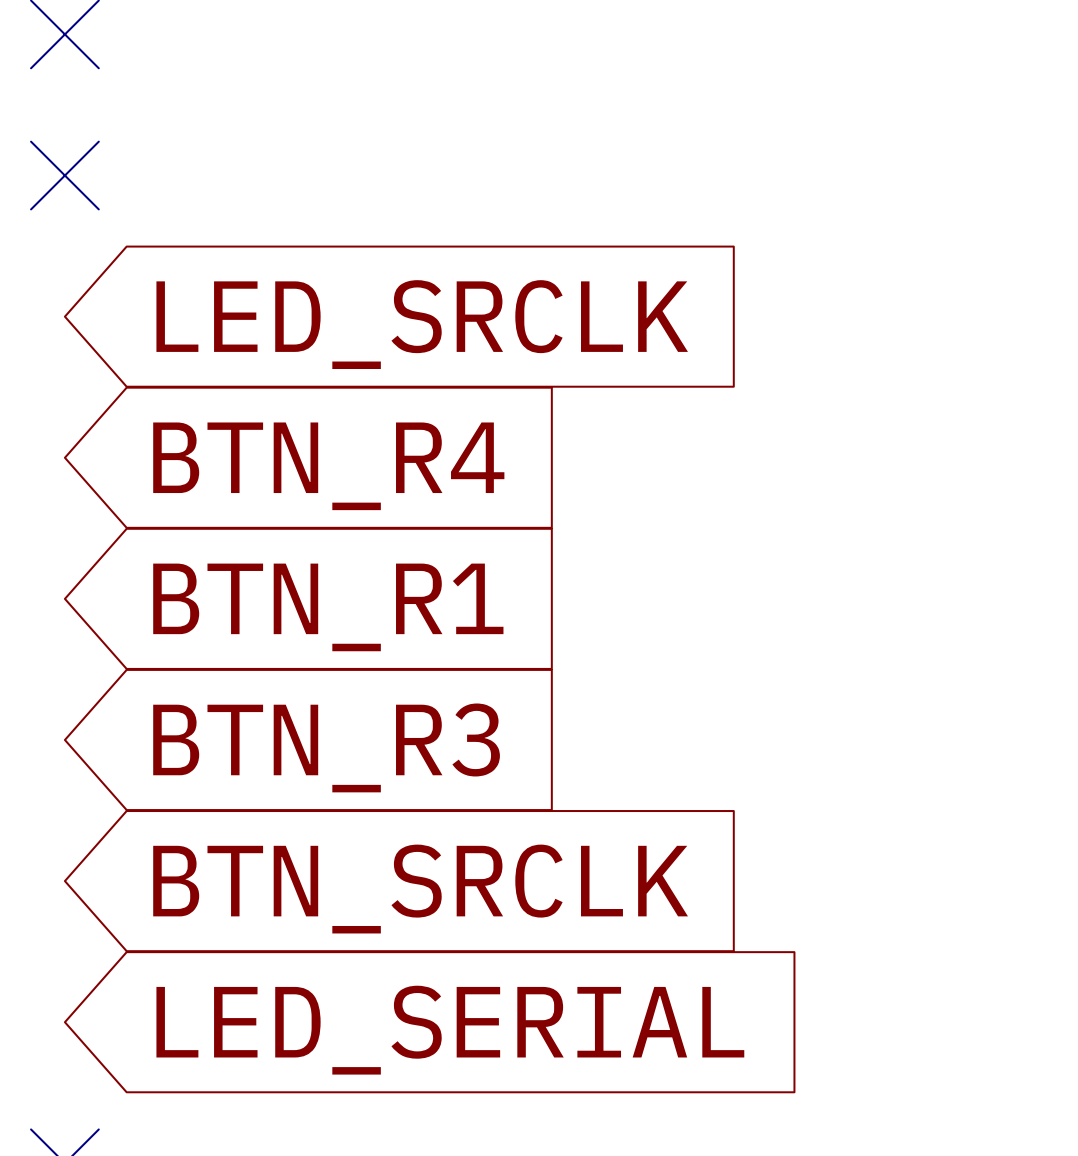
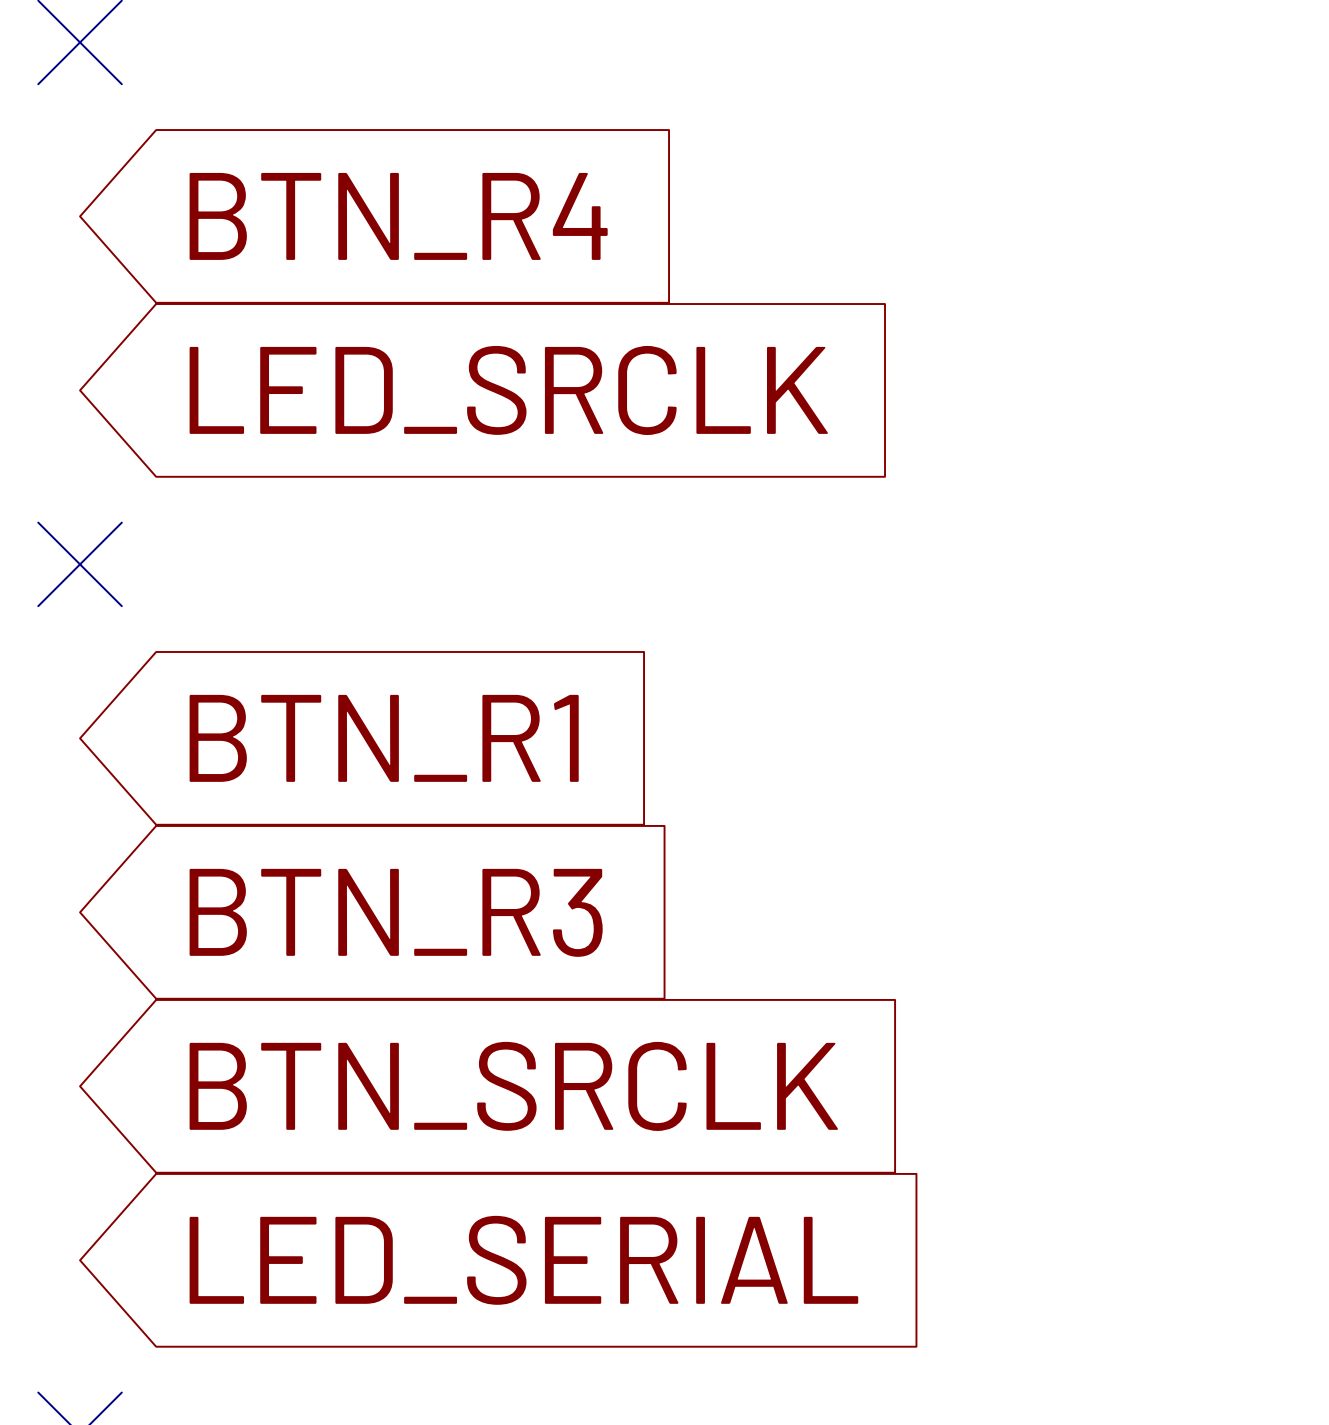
no-connect mark position: (64, 175) -> (80, 564)
global label position: BTN_R4 (328, 466) -> BTN_R4 (398, 216)

